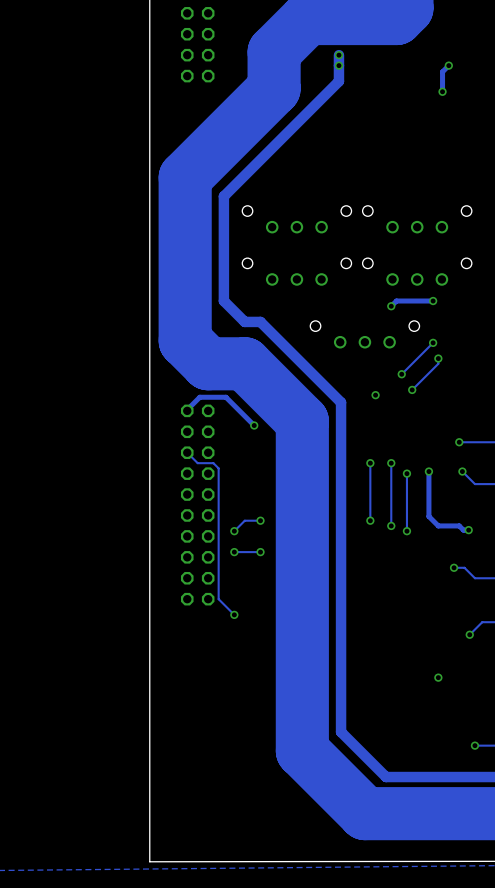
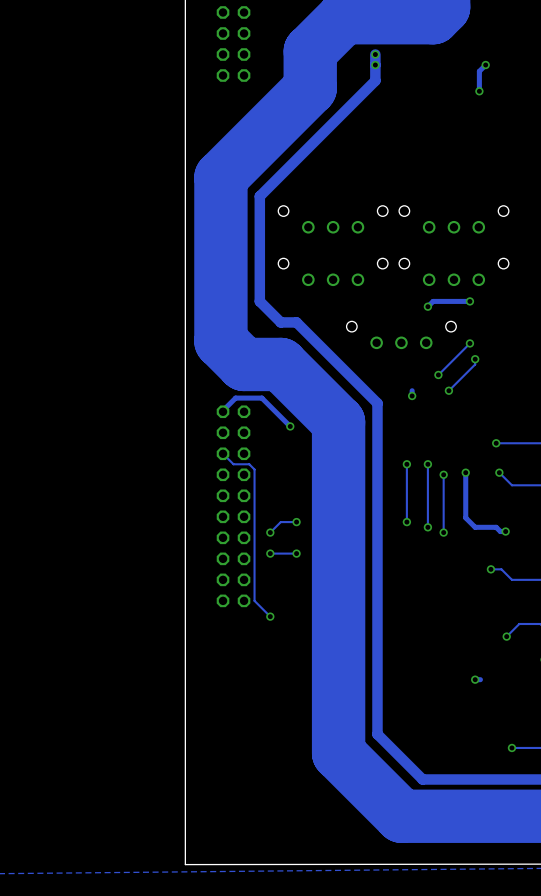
track: none -> (412, 390) (412, 395)
track: none -> (480, 679) (475, 679)

